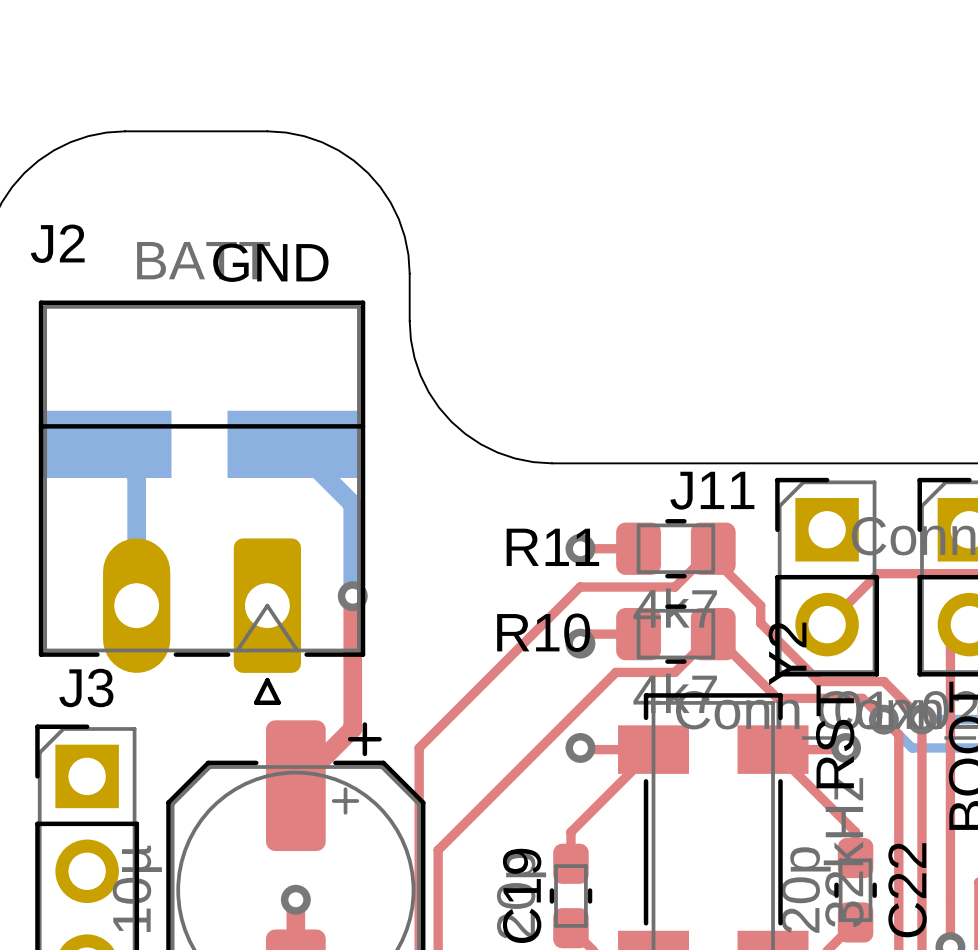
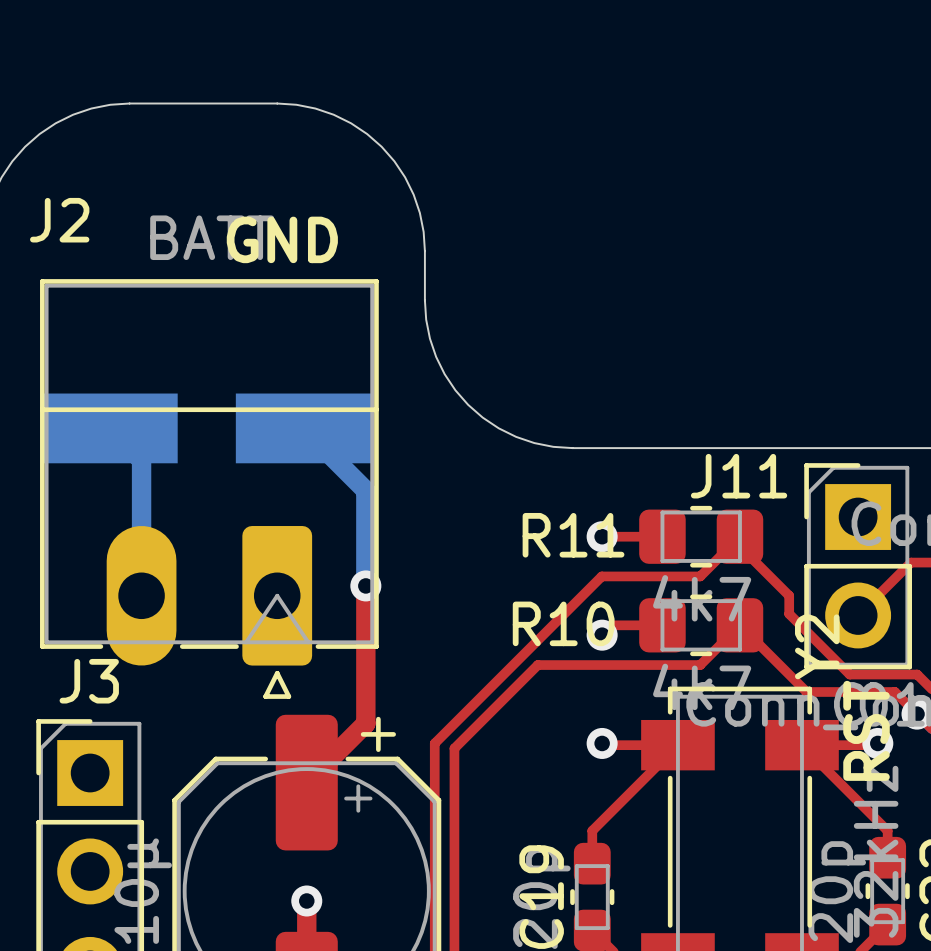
top track: (615, 672) (438, 850) -> (638, 665) (537, 665) (454, 748) (454, 849)

